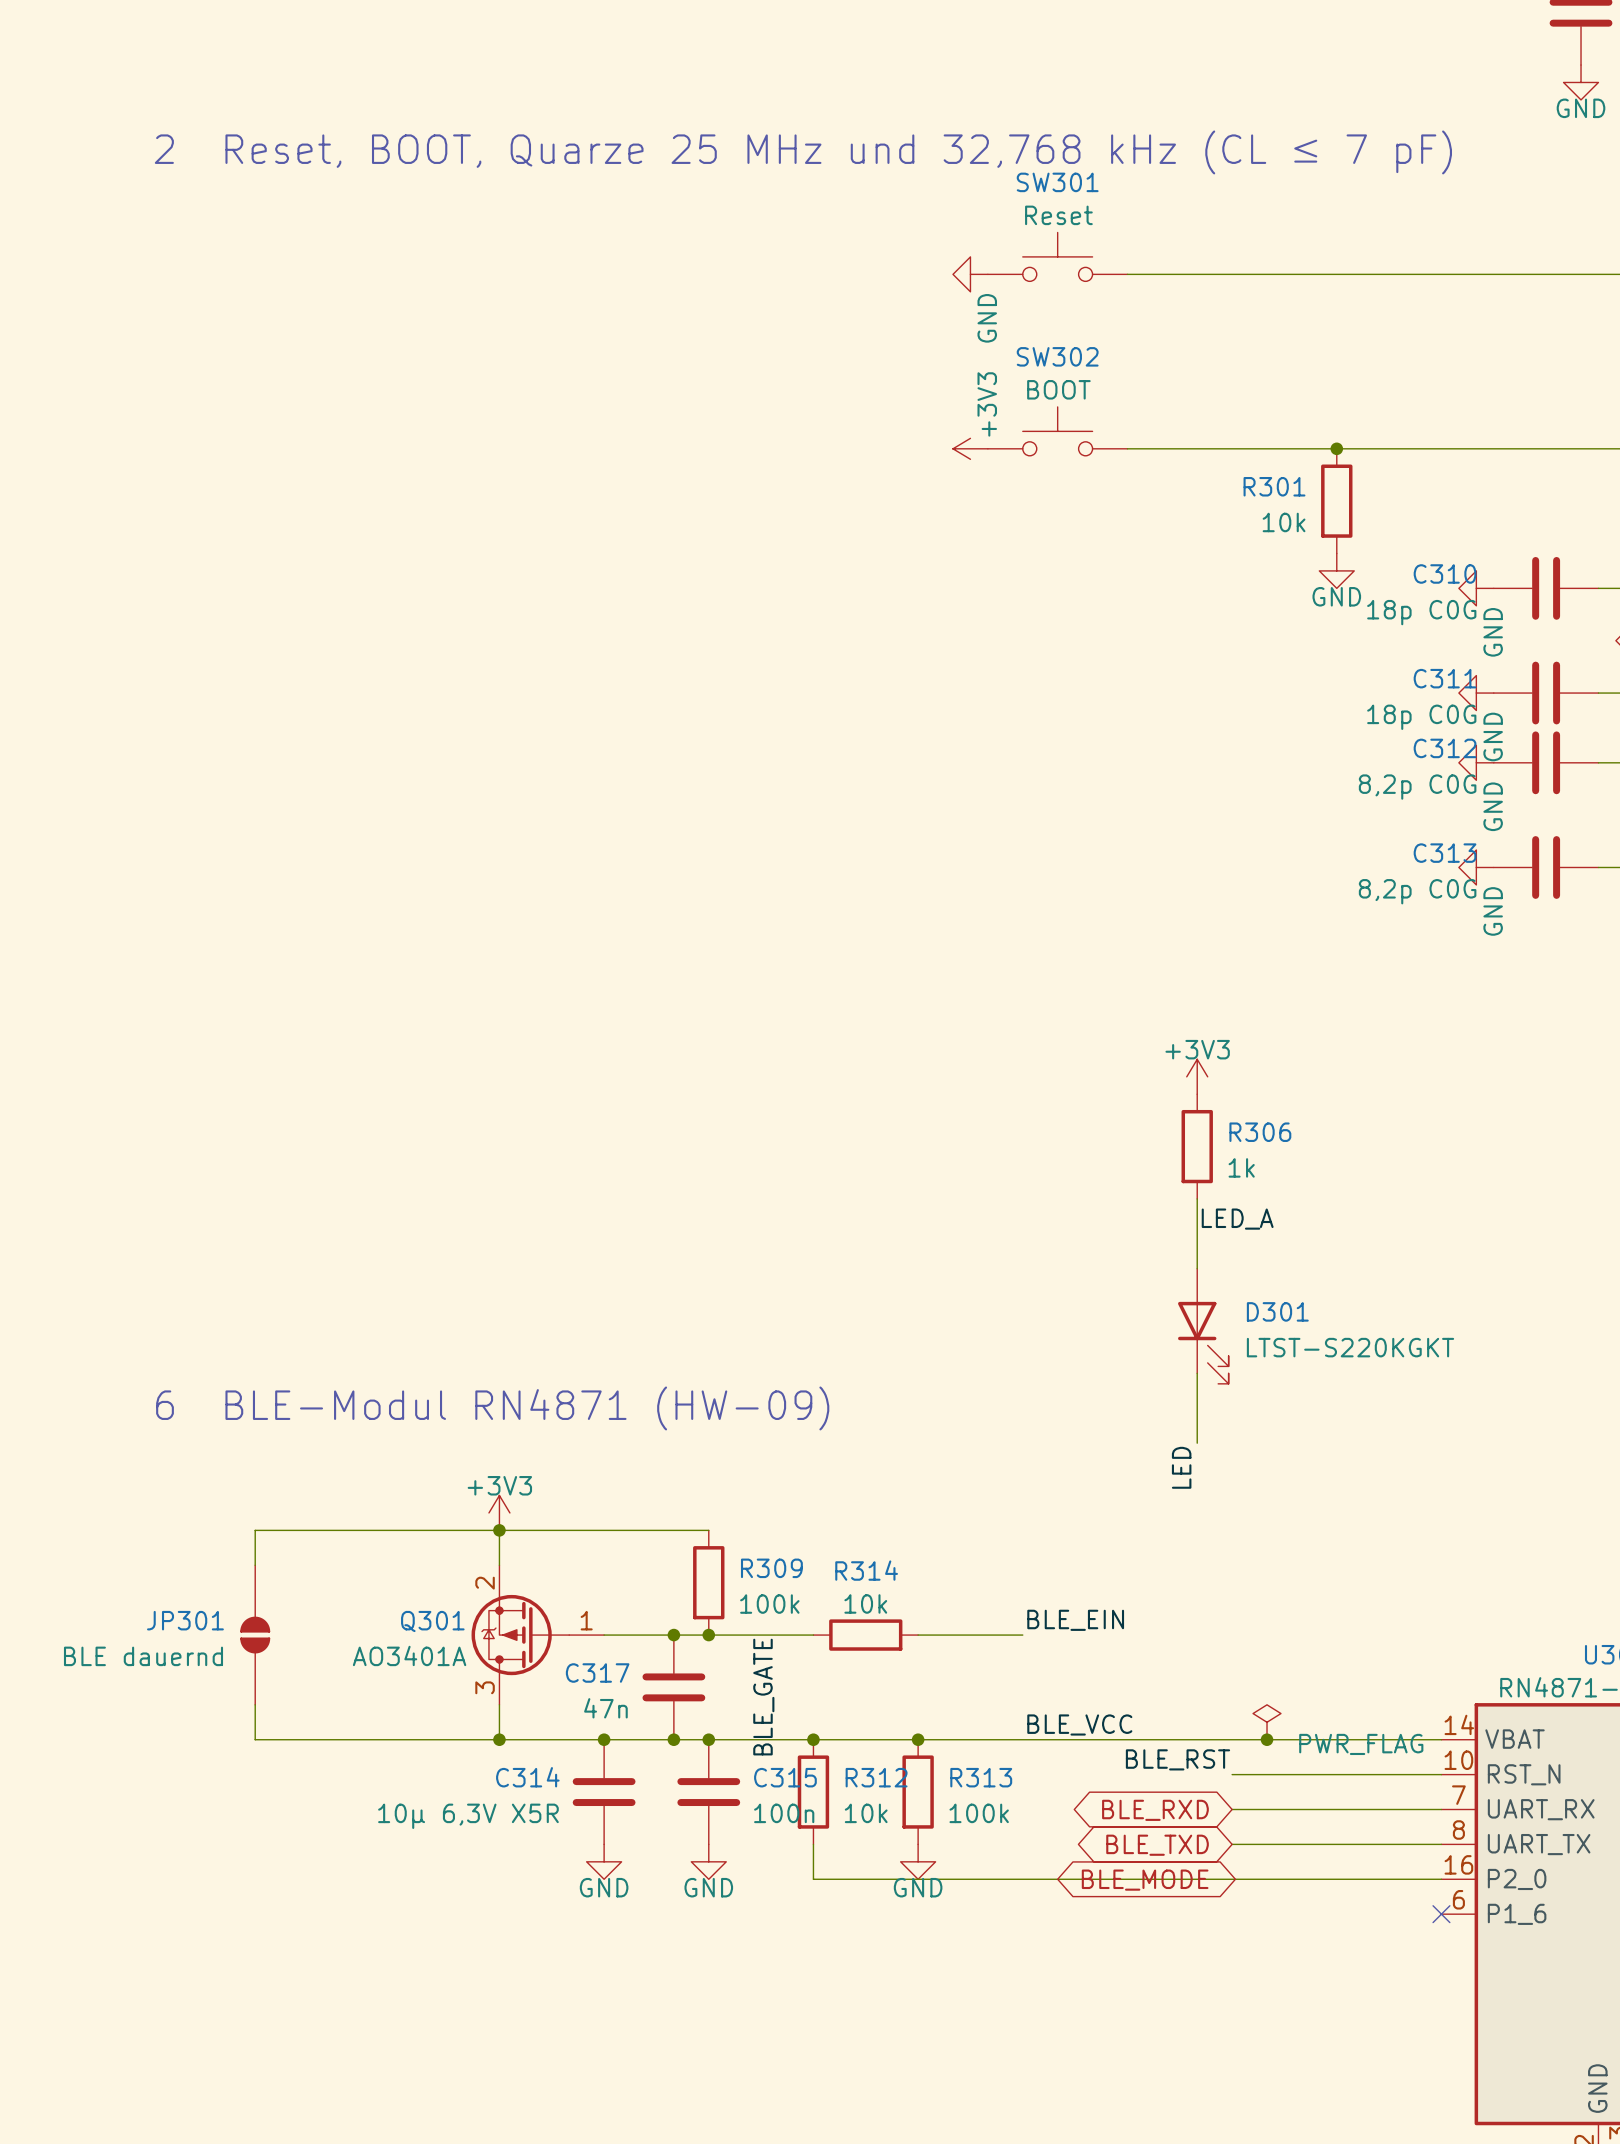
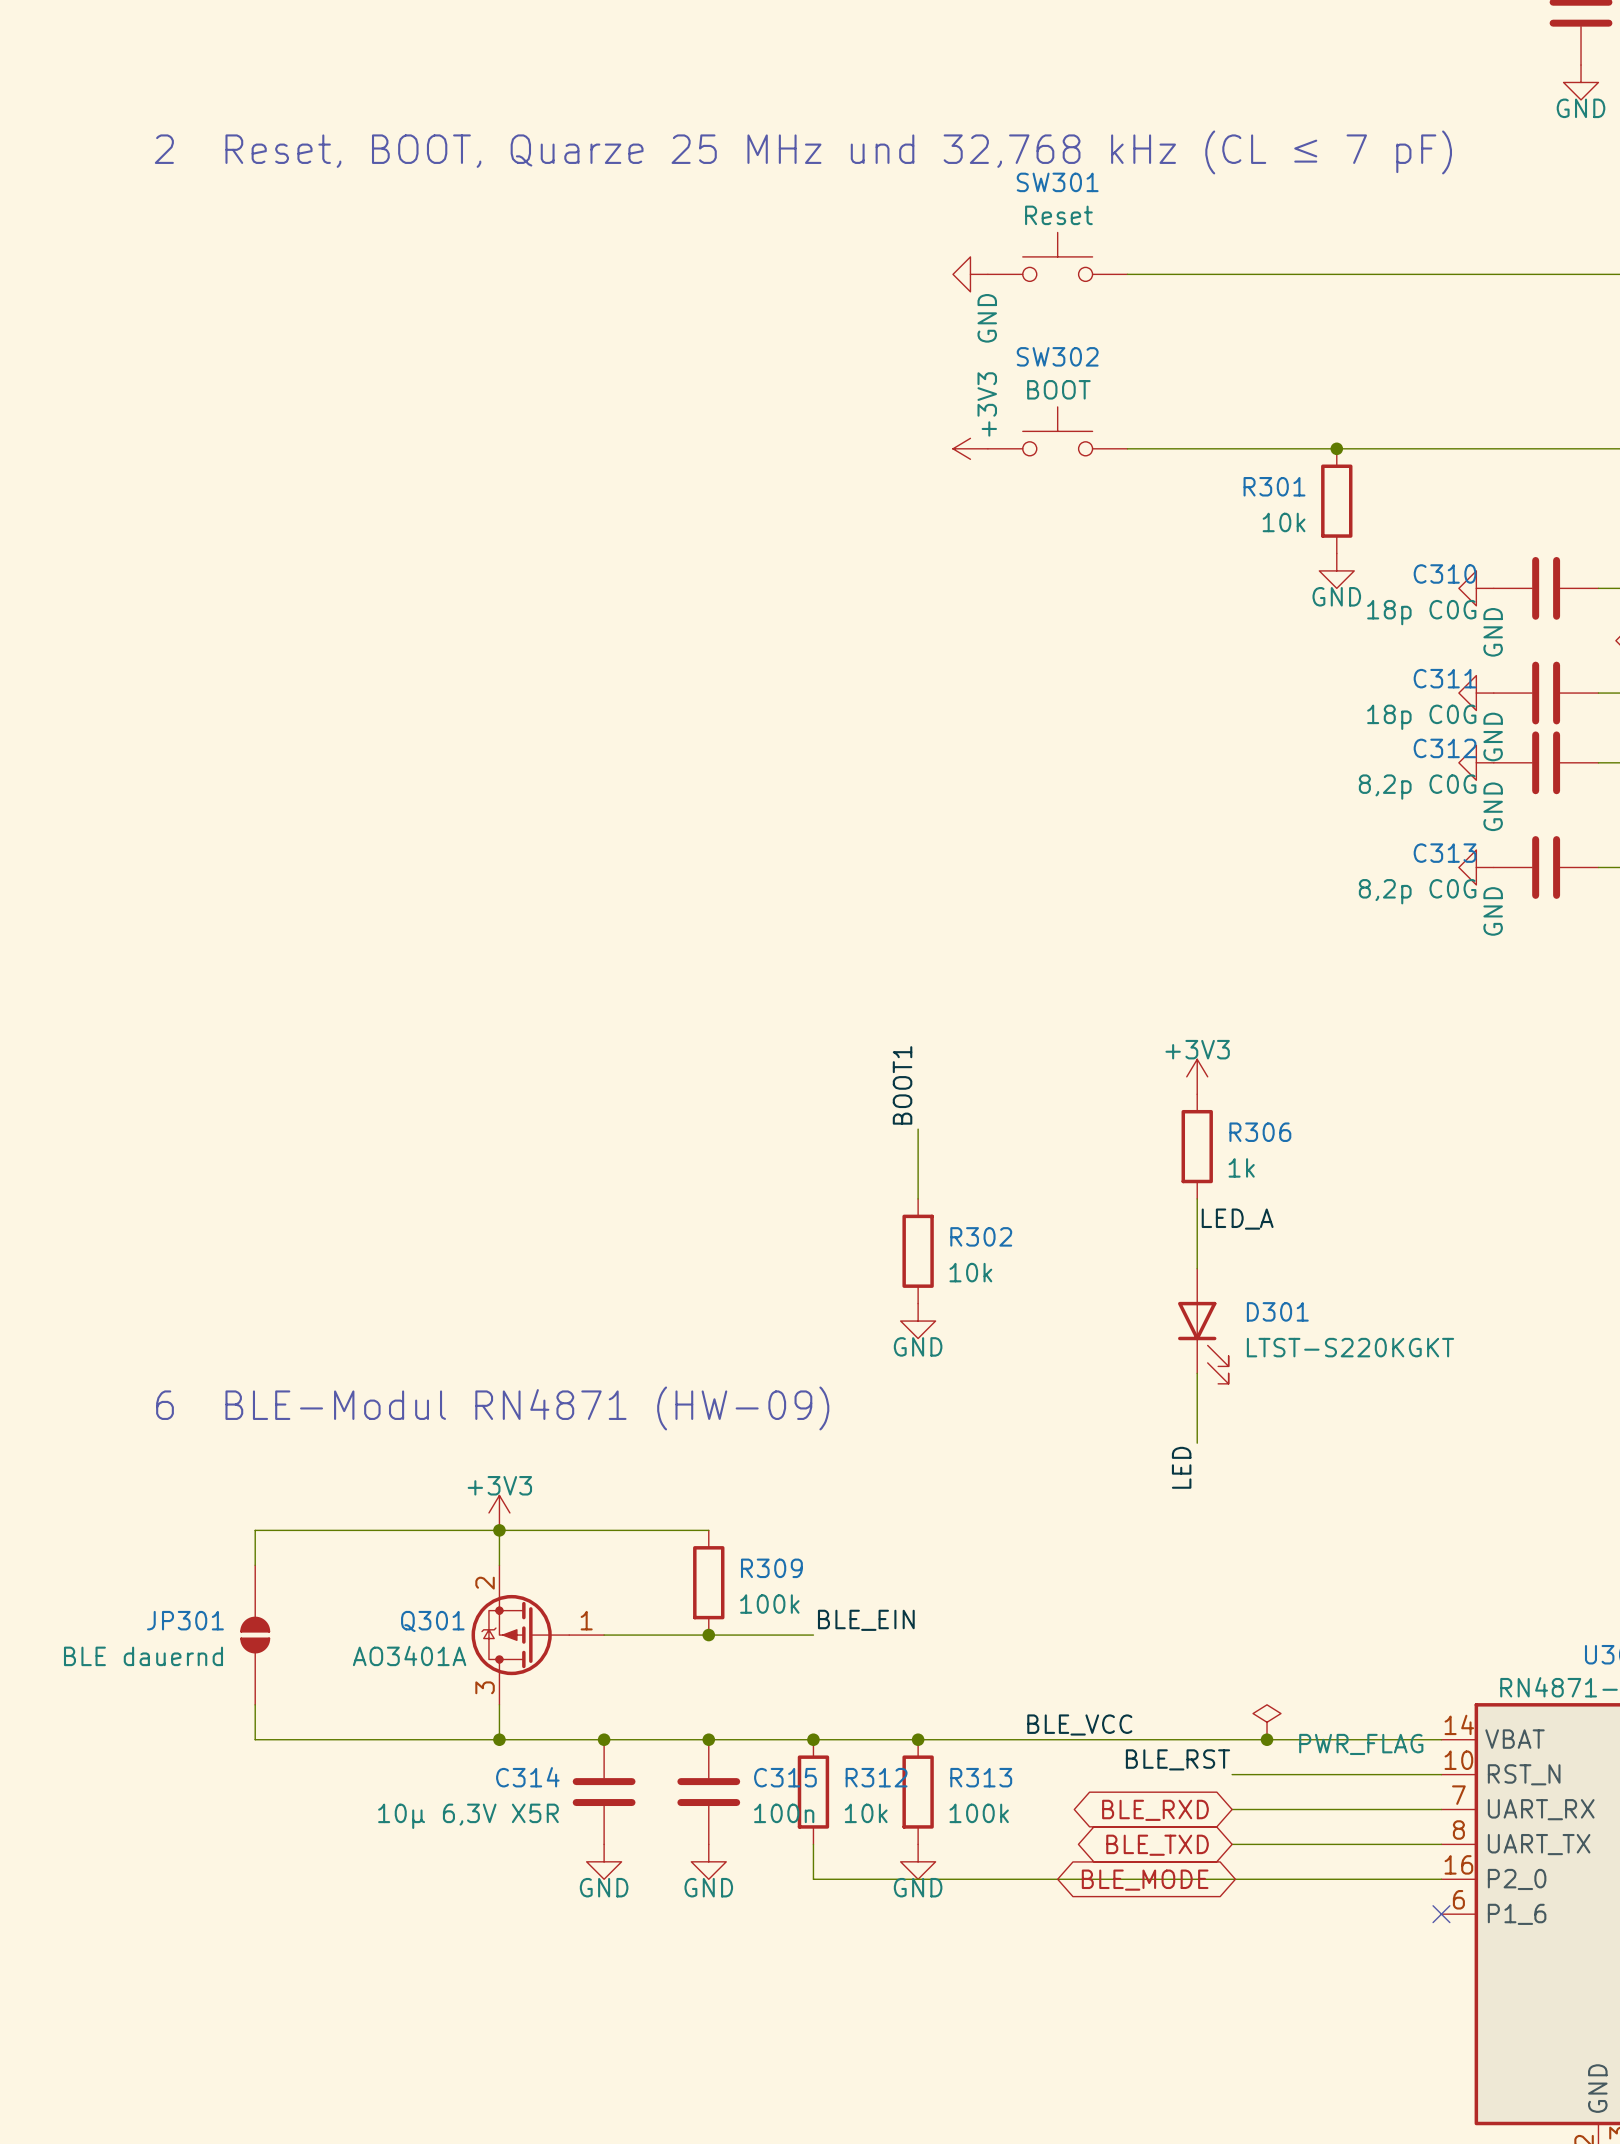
label: none -> BOOT1 (902, 1085)
wire: none -> (918, 1129) (918, 1198)
R302: none -> 10k (918, 1251)
power symbol: none -> GND (918, 1321)
label position: BLE_EIN (1075, 1620) -> BLE_EIN (866, 1620)
junction: (673, 1635) -> none
R314: 10k (865, 1635) -> none
wire: (918, 1635) (1022, 1635) -> none
C317: 47n (673, 1687) -> none
label: BLE_GATE (763, 1697) -> none
junction: (673, 1739) -> none

